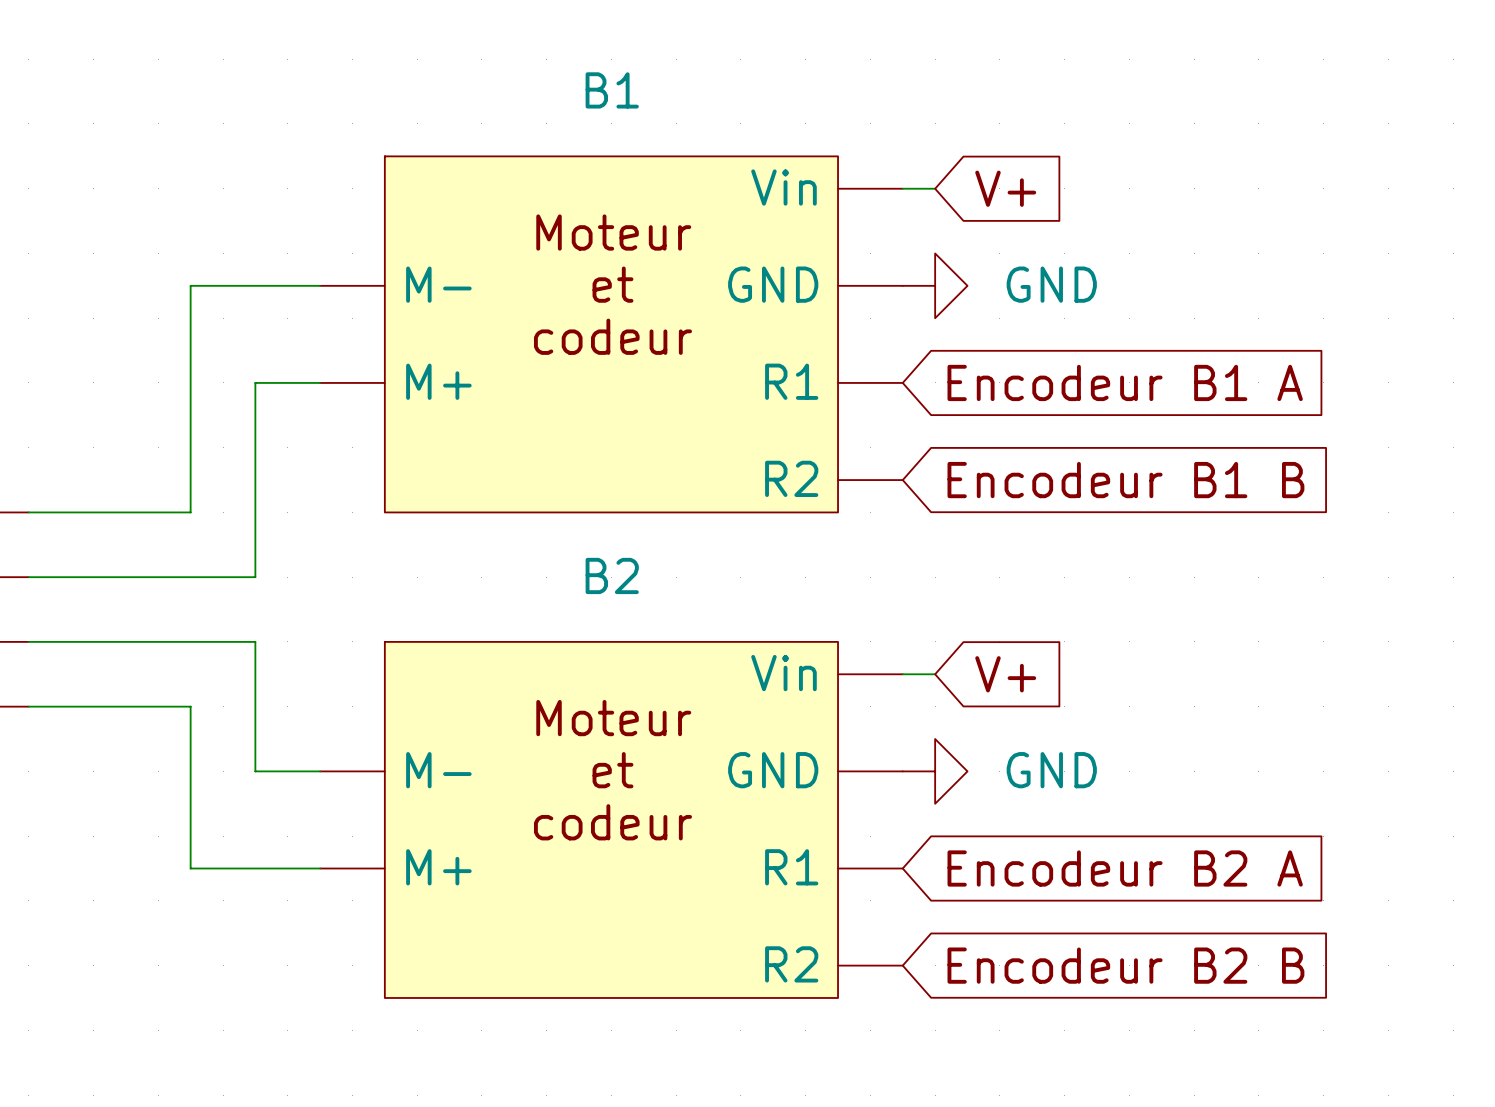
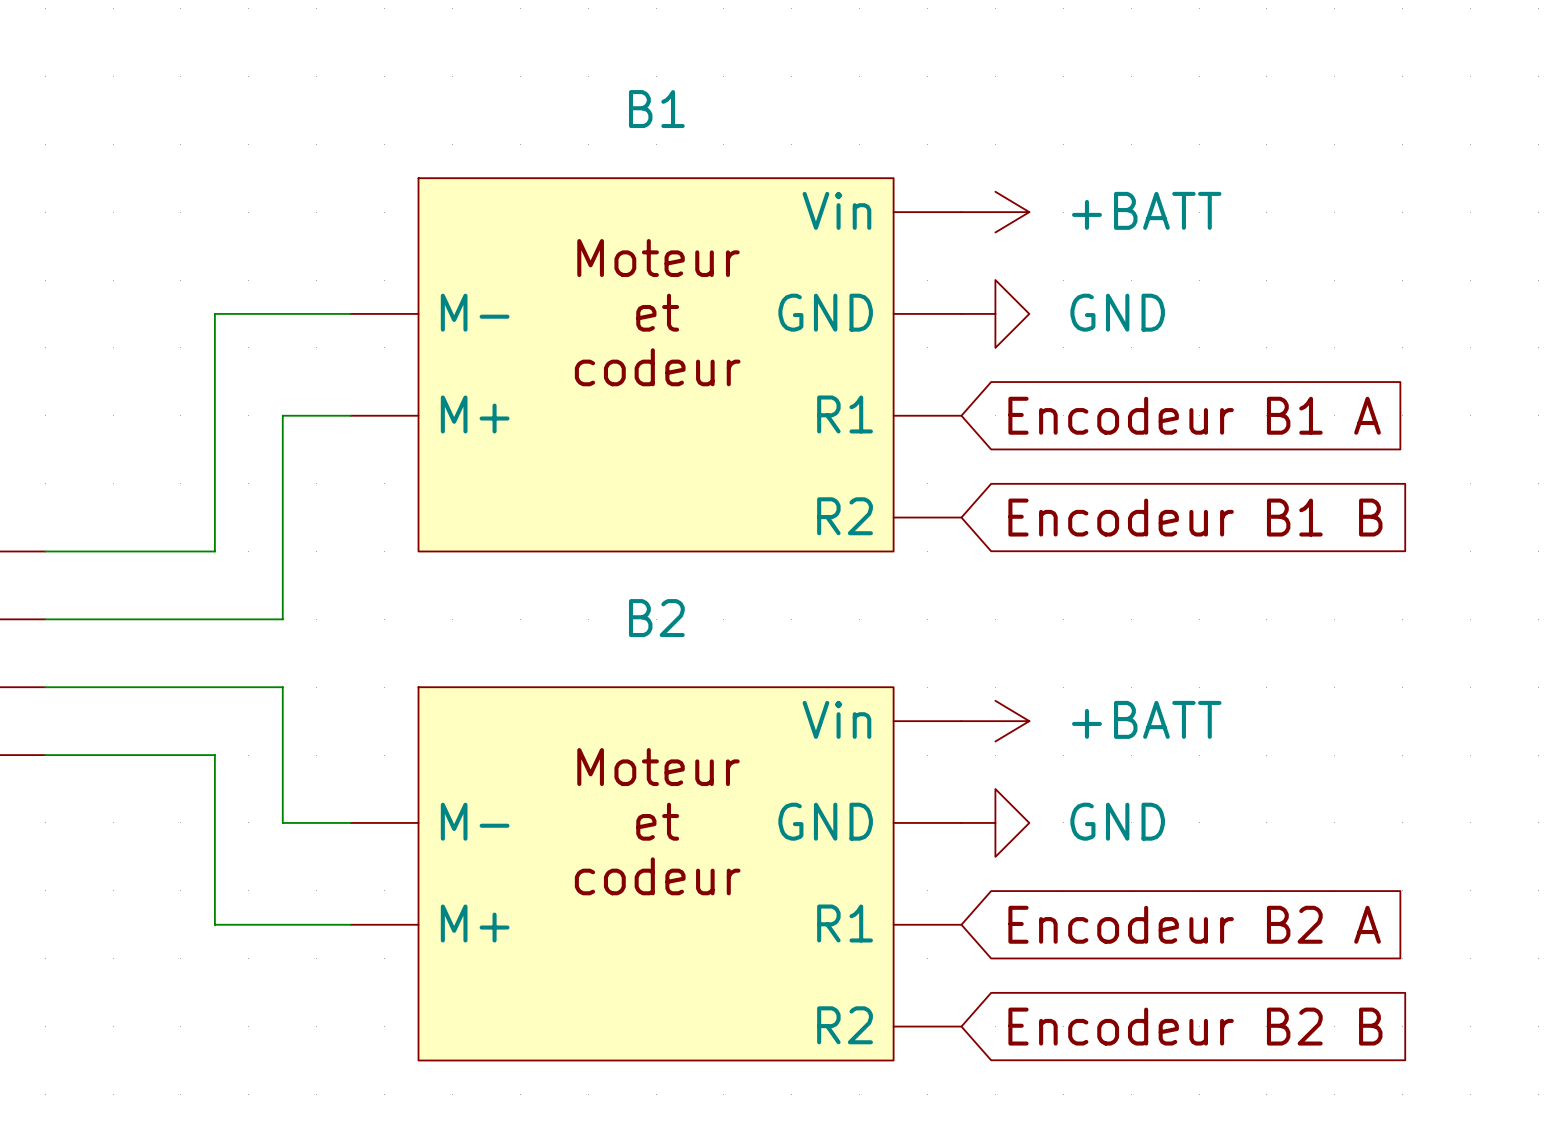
power symbol: none -> +BATT (995, 212)
global label: V+ (1005, 188) -> none
power symbol: none -> +BATT (995, 721)
global label: V+ (1005, 674) -> none

